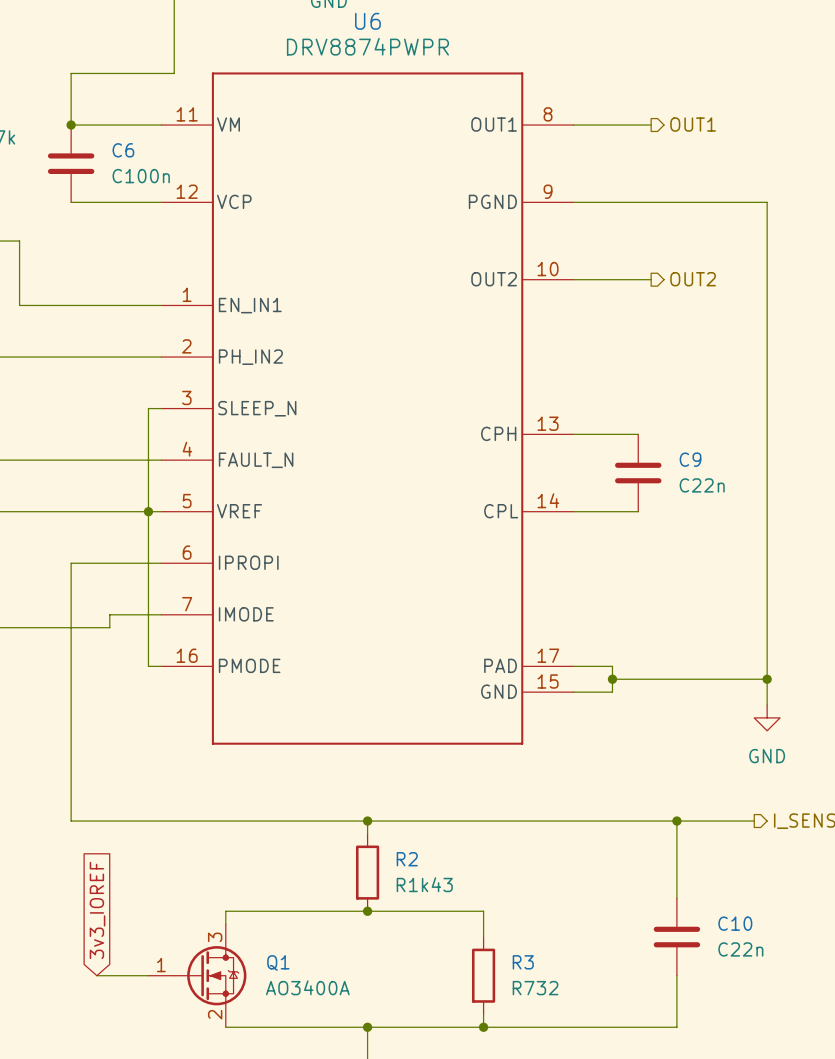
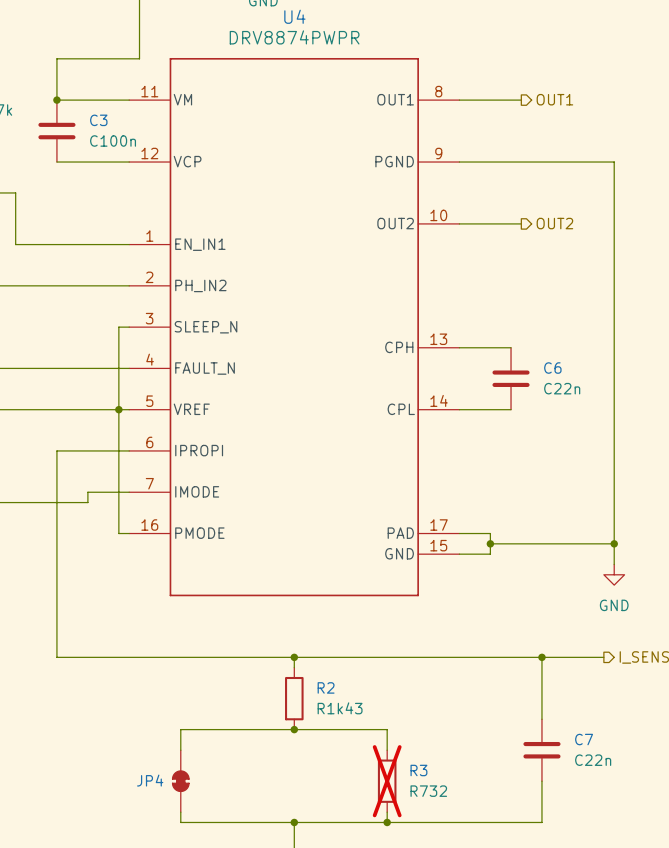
U6 name: U6 (367, 21) -> U4 (294, 16)
C6 name: C6 (123, 150) -> C3 (98, 120)
C9 name: C9 (690, 459) -> C6 (552, 368)
global label: 3v3_IOREF (97, 910) -> none
C10 name: C10 (735, 923) -> C7 (584, 739)
wire: (96, 975) (148, 975) -> none
Q1: AO3400A (197, 975) -> none
JP4: none -> (180, 781)
R3 do-not-place cross: none -> (387, 781)

